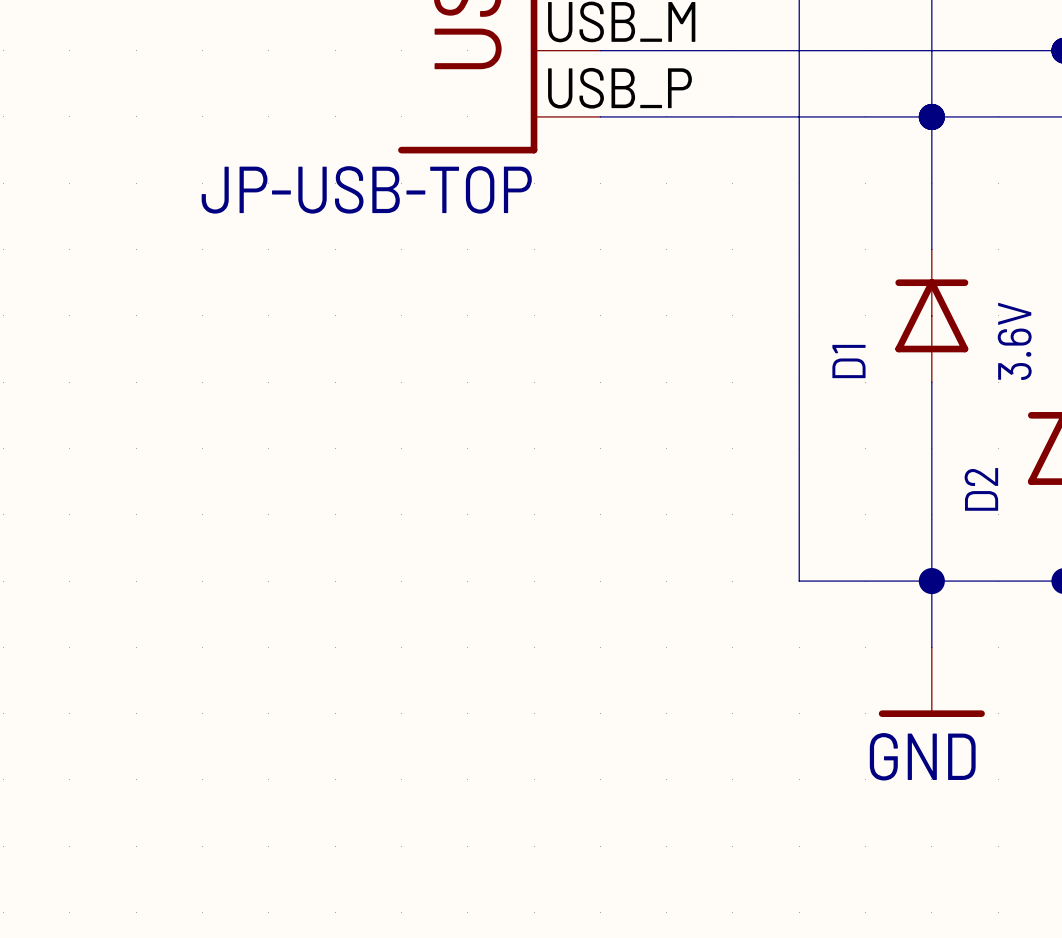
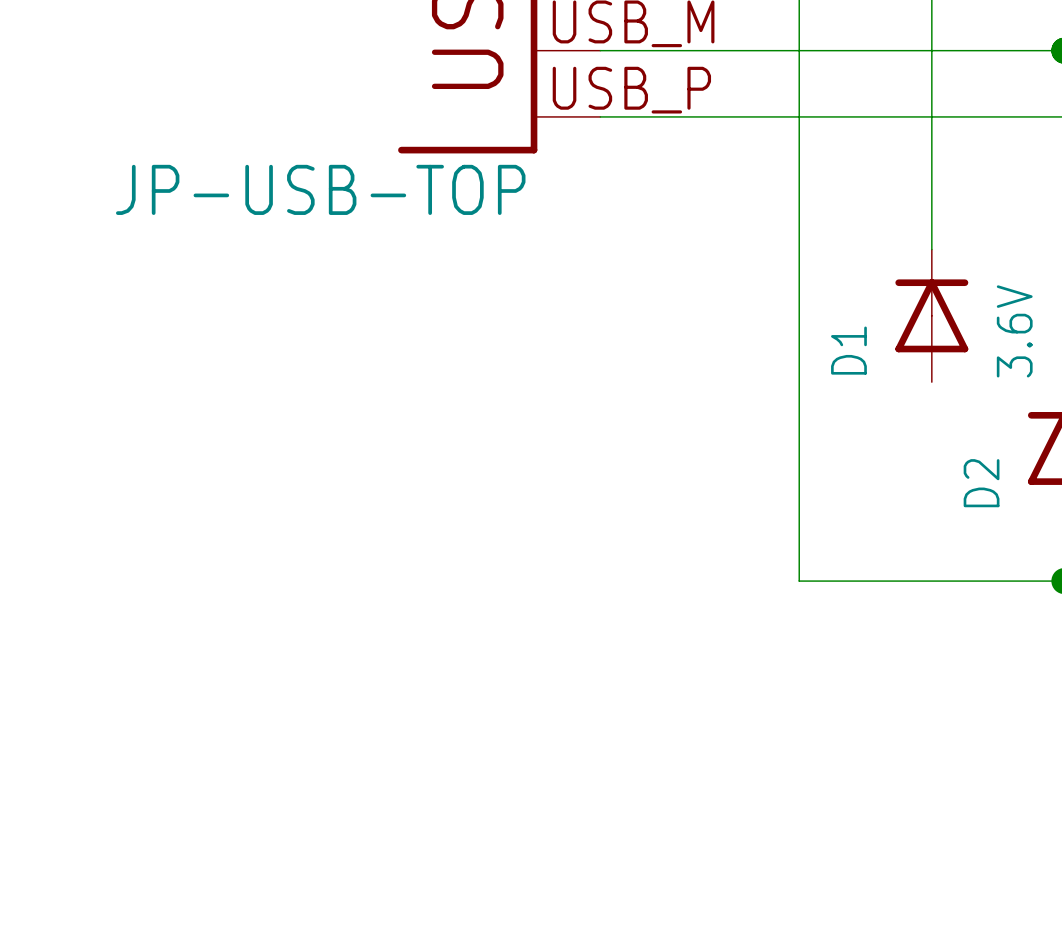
junction: (931, 116) -> none
wire: (931, 382) (931, 647) -> none
junction: (931, 581) -> none
power symbol: GND (931, 682) -> none

